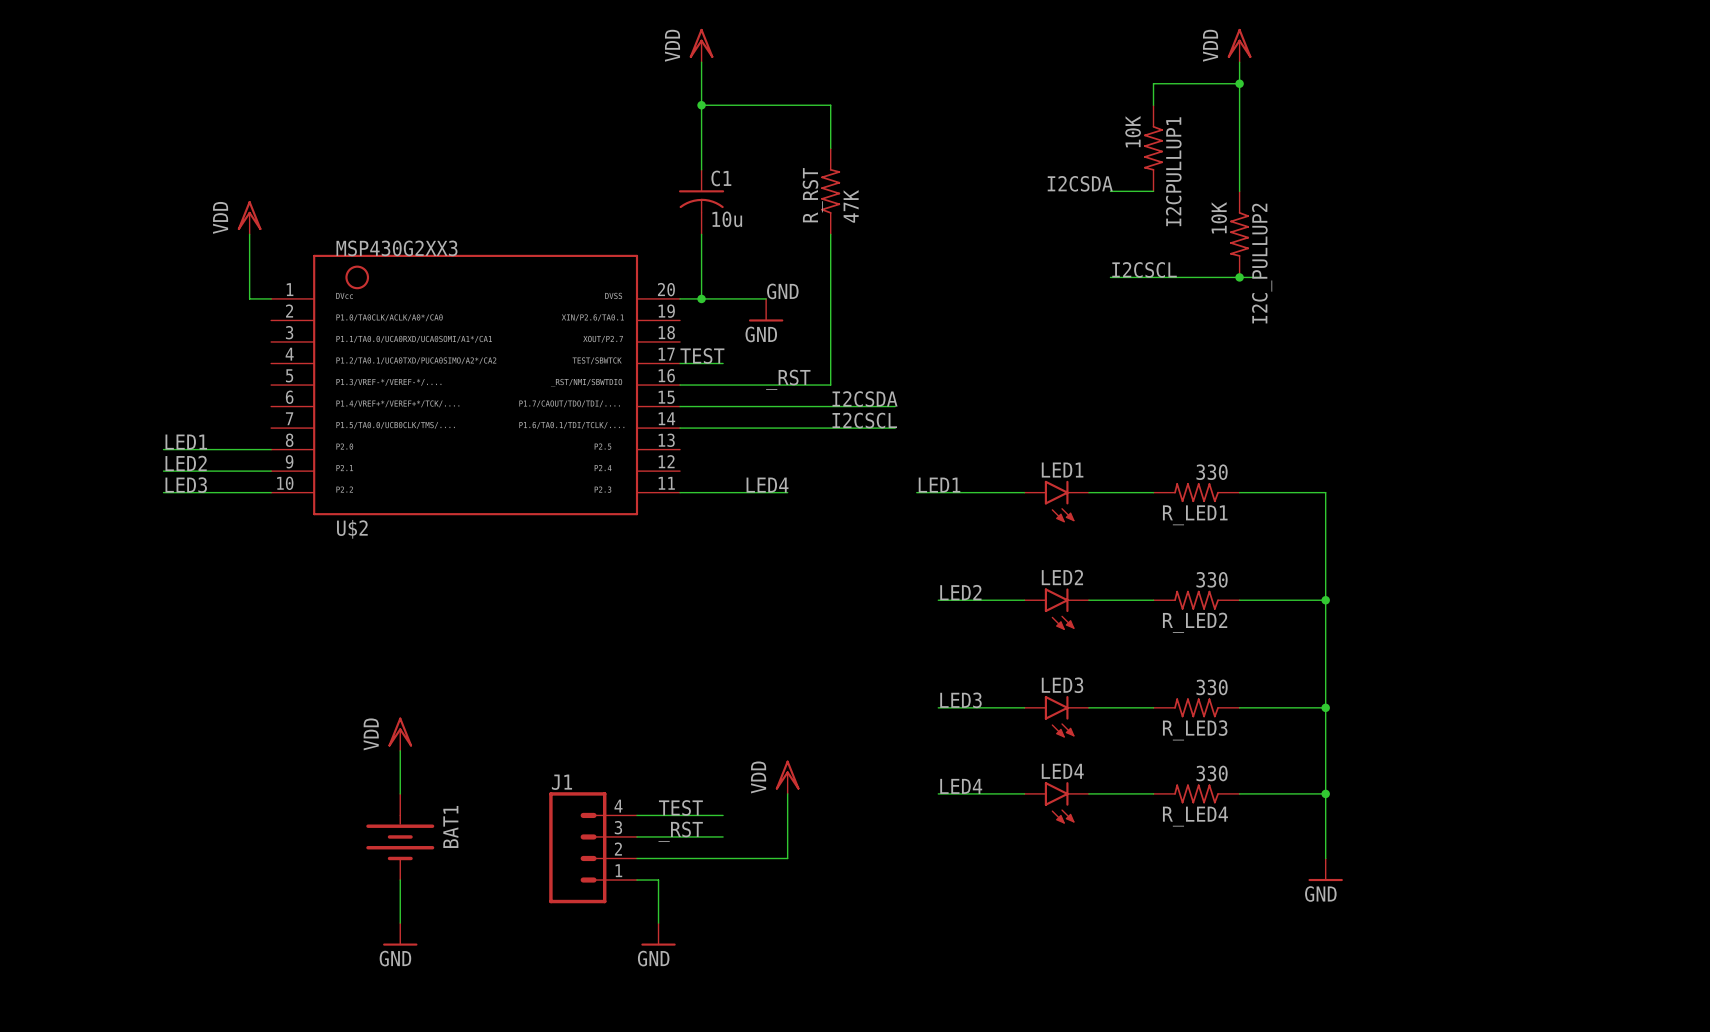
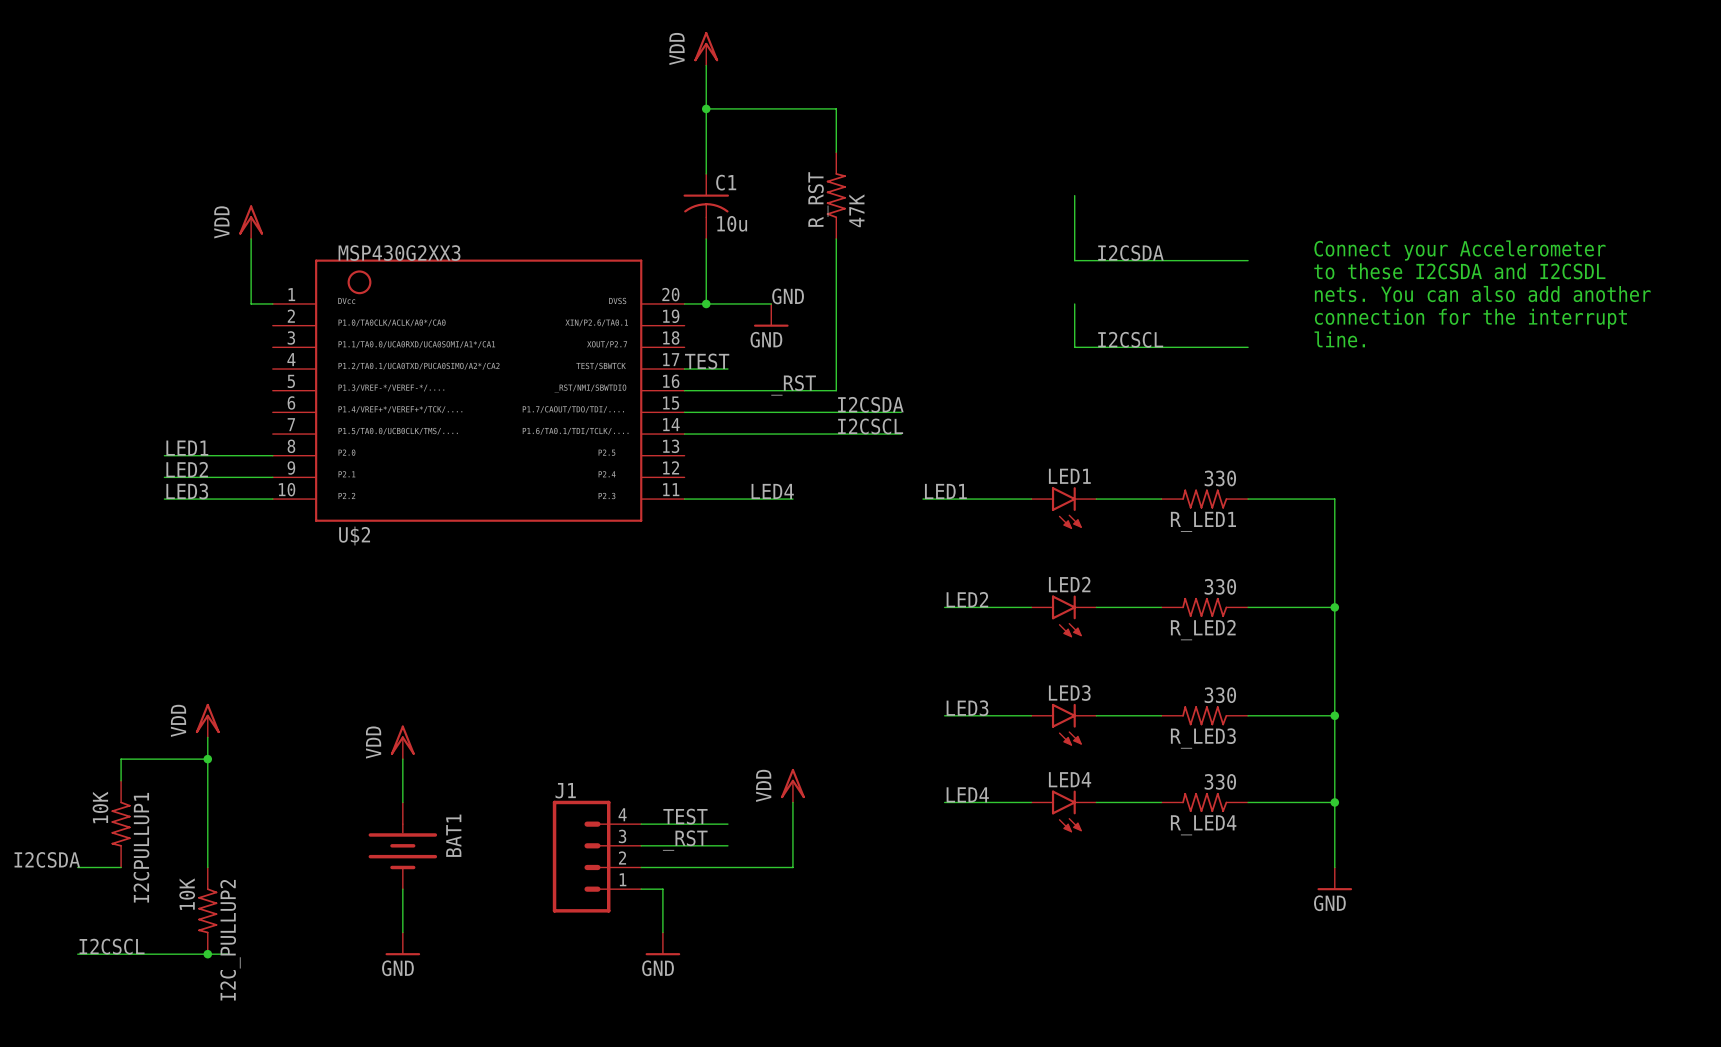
power symbol: VDD (1239, 45) -> none
wire: (1239, 62) (1239, 191) -> none
wire: (1239, 83) (1153, 83) (1153, 105) -> none
junction: (1239, 83) -> none
I2CPULLUP1 position: (1153, 148) -> (121, 824)
label position: I2CSDA (1080, 183) -> I2CSDA (1130, 253)
wire: none -> (1074, 195) (1074, 260) (1248, 260)
wire: (1110, 191) (1153, 191) -> none
I2C_PULLUP2 position: (1239, 234) -> (207, 910)
text: none -> Connect your Accelerometer (1459, 250)
text: none -> to these I2CSDA and I2CSDL (1459, 271)
label position: I2CSCL (1144, 269) -> I2CSCL (1130, 339)
wire: (1110, 277) (1261, 277) -> none
junction: (1239, 277) -> none
text: none -> nets. You can also add another (1482, 294)
wire: none -> (1074, 303) (1074, 347) (1248, 347)
text: none -> connection for the interrupt (1470, 318)
text: none -> line. (1339, 339)
power symbol: none -> VDD (207, 720)
wire: none -> (207, 737) (207, 867)
wire: none -> (207, 759) (121, 759) (121, 780)
junction: none -> (207, 759)
label: none -> I2CSDA (47, 859)
wire: none -> (77, 867) (121, 867)
label: none -> I2CSCL (112, 946)
wire: none -> (77, 954) (229, 954)
junction: none -> (207, 954)

